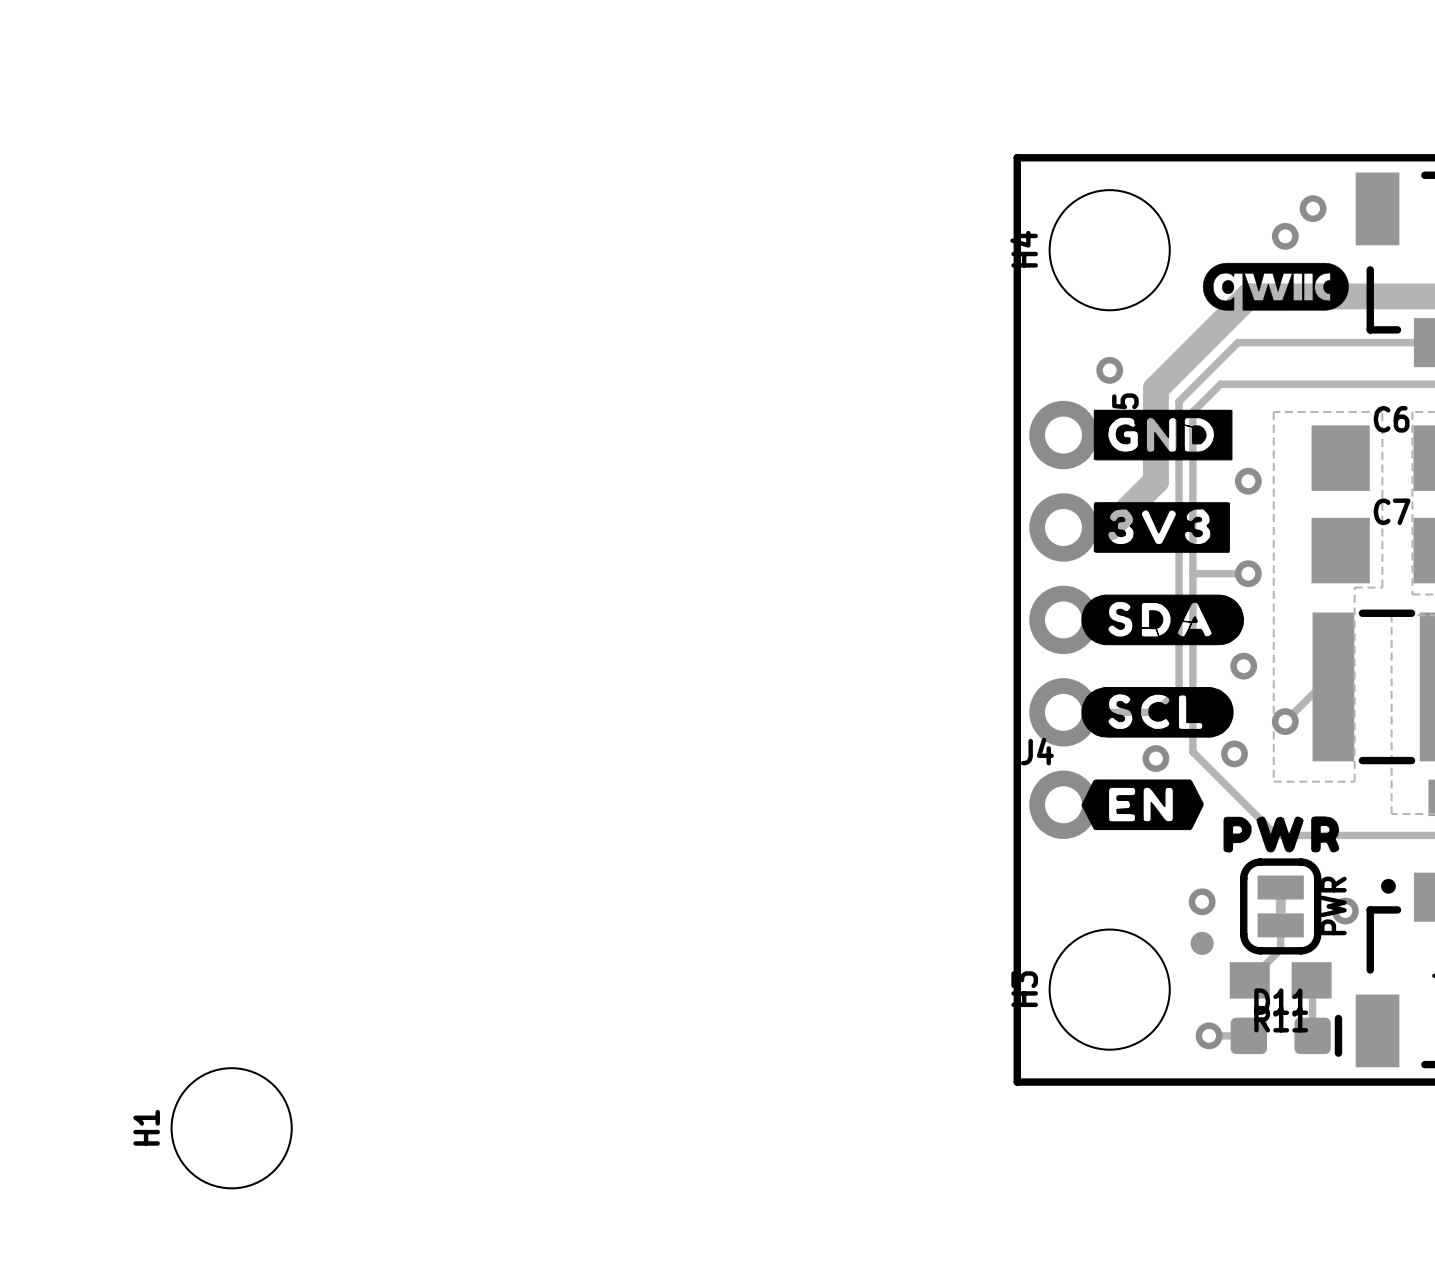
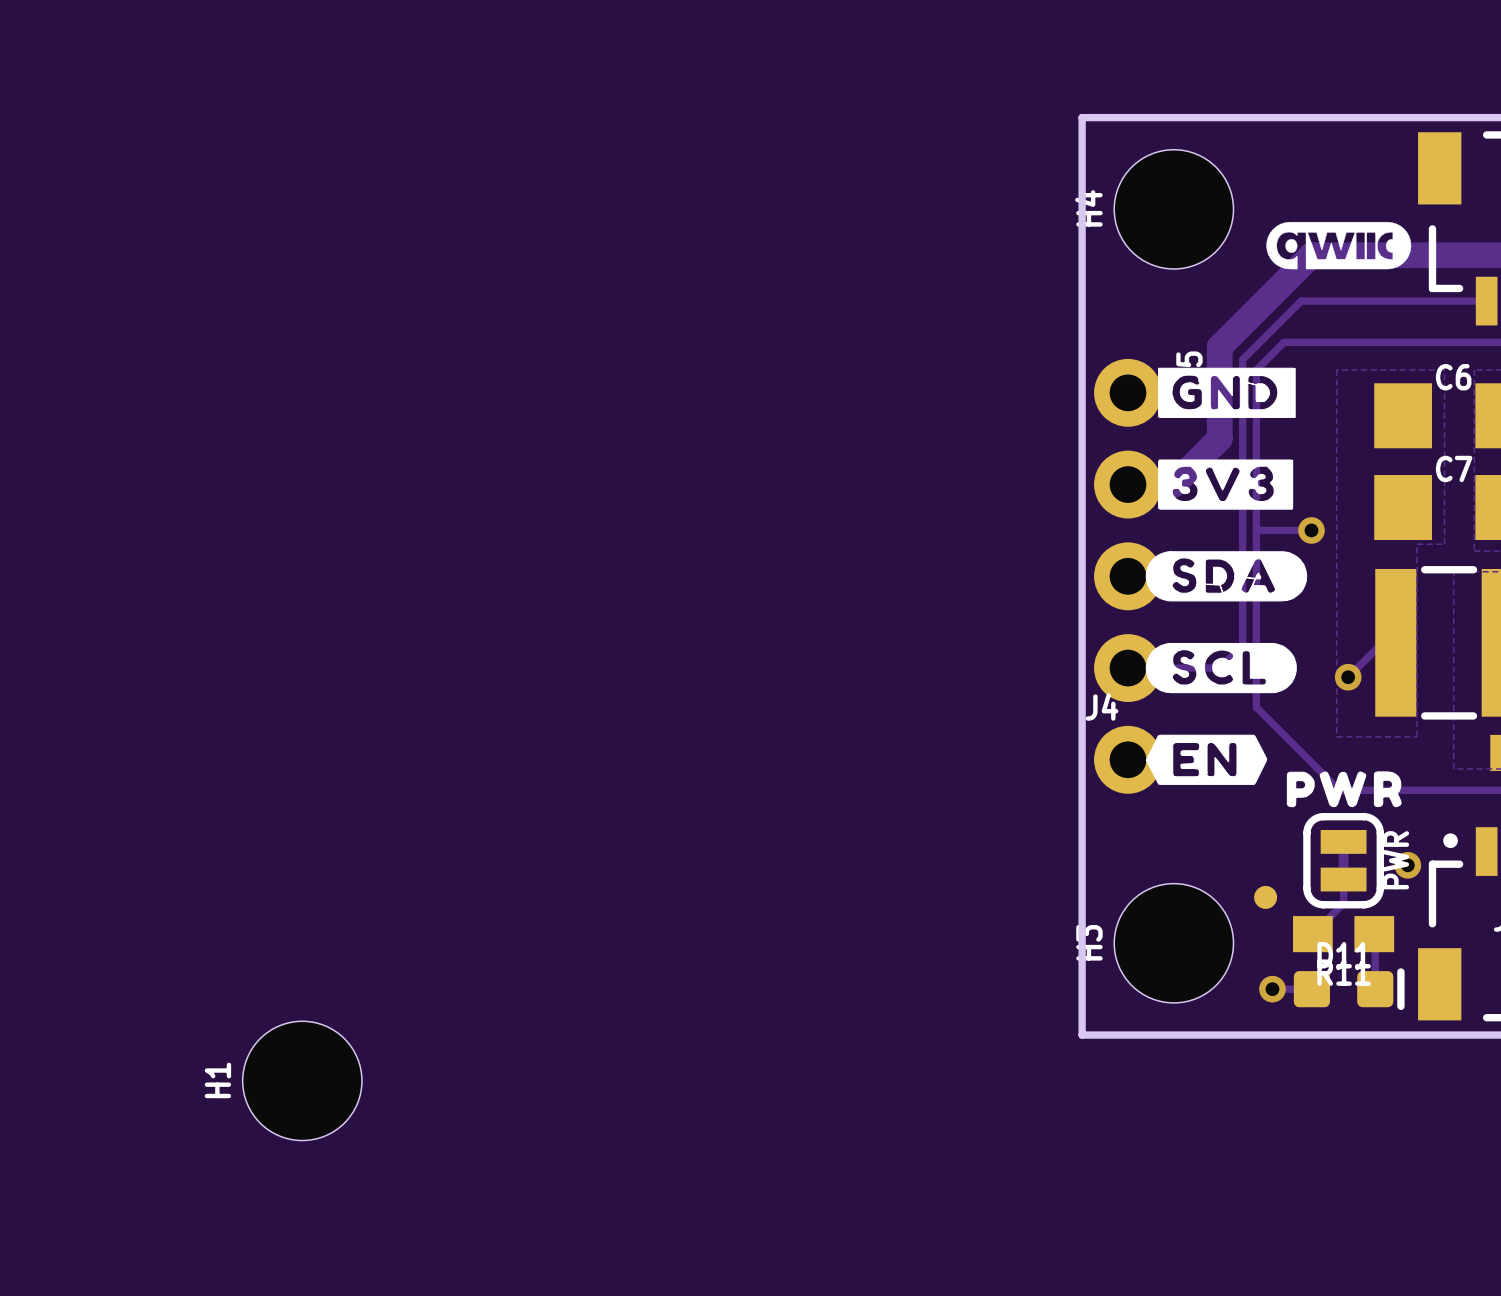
via: (1313, 208) -> none
via: (1285, 236) -> none
via: (1109, 370) -> none
via: (1248, 481) -> none
via: (1243, 666) -> none
via: (1234, 753) -> none
via: (1155, 758) -> none
via: (1202, 901) -> none

